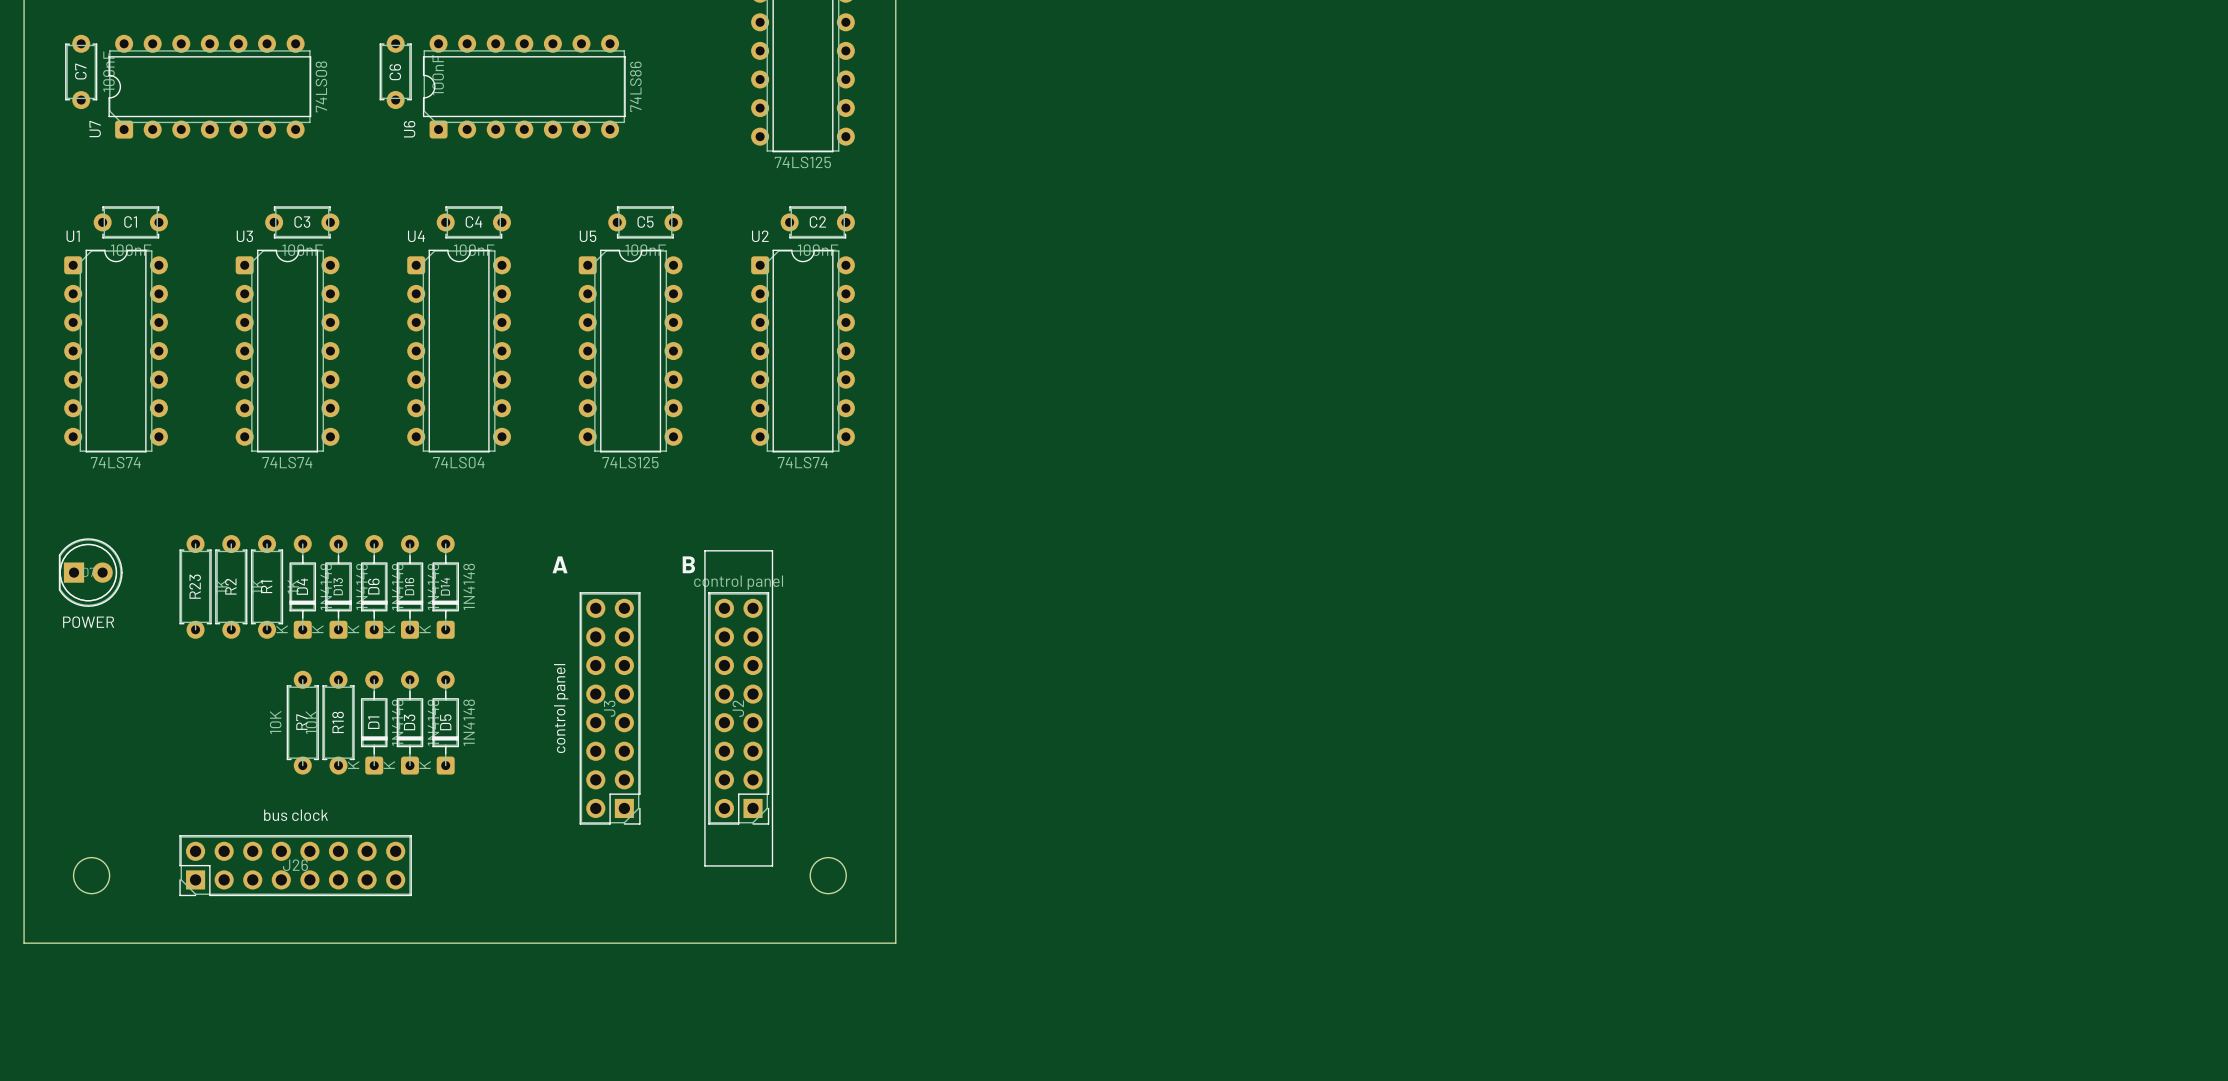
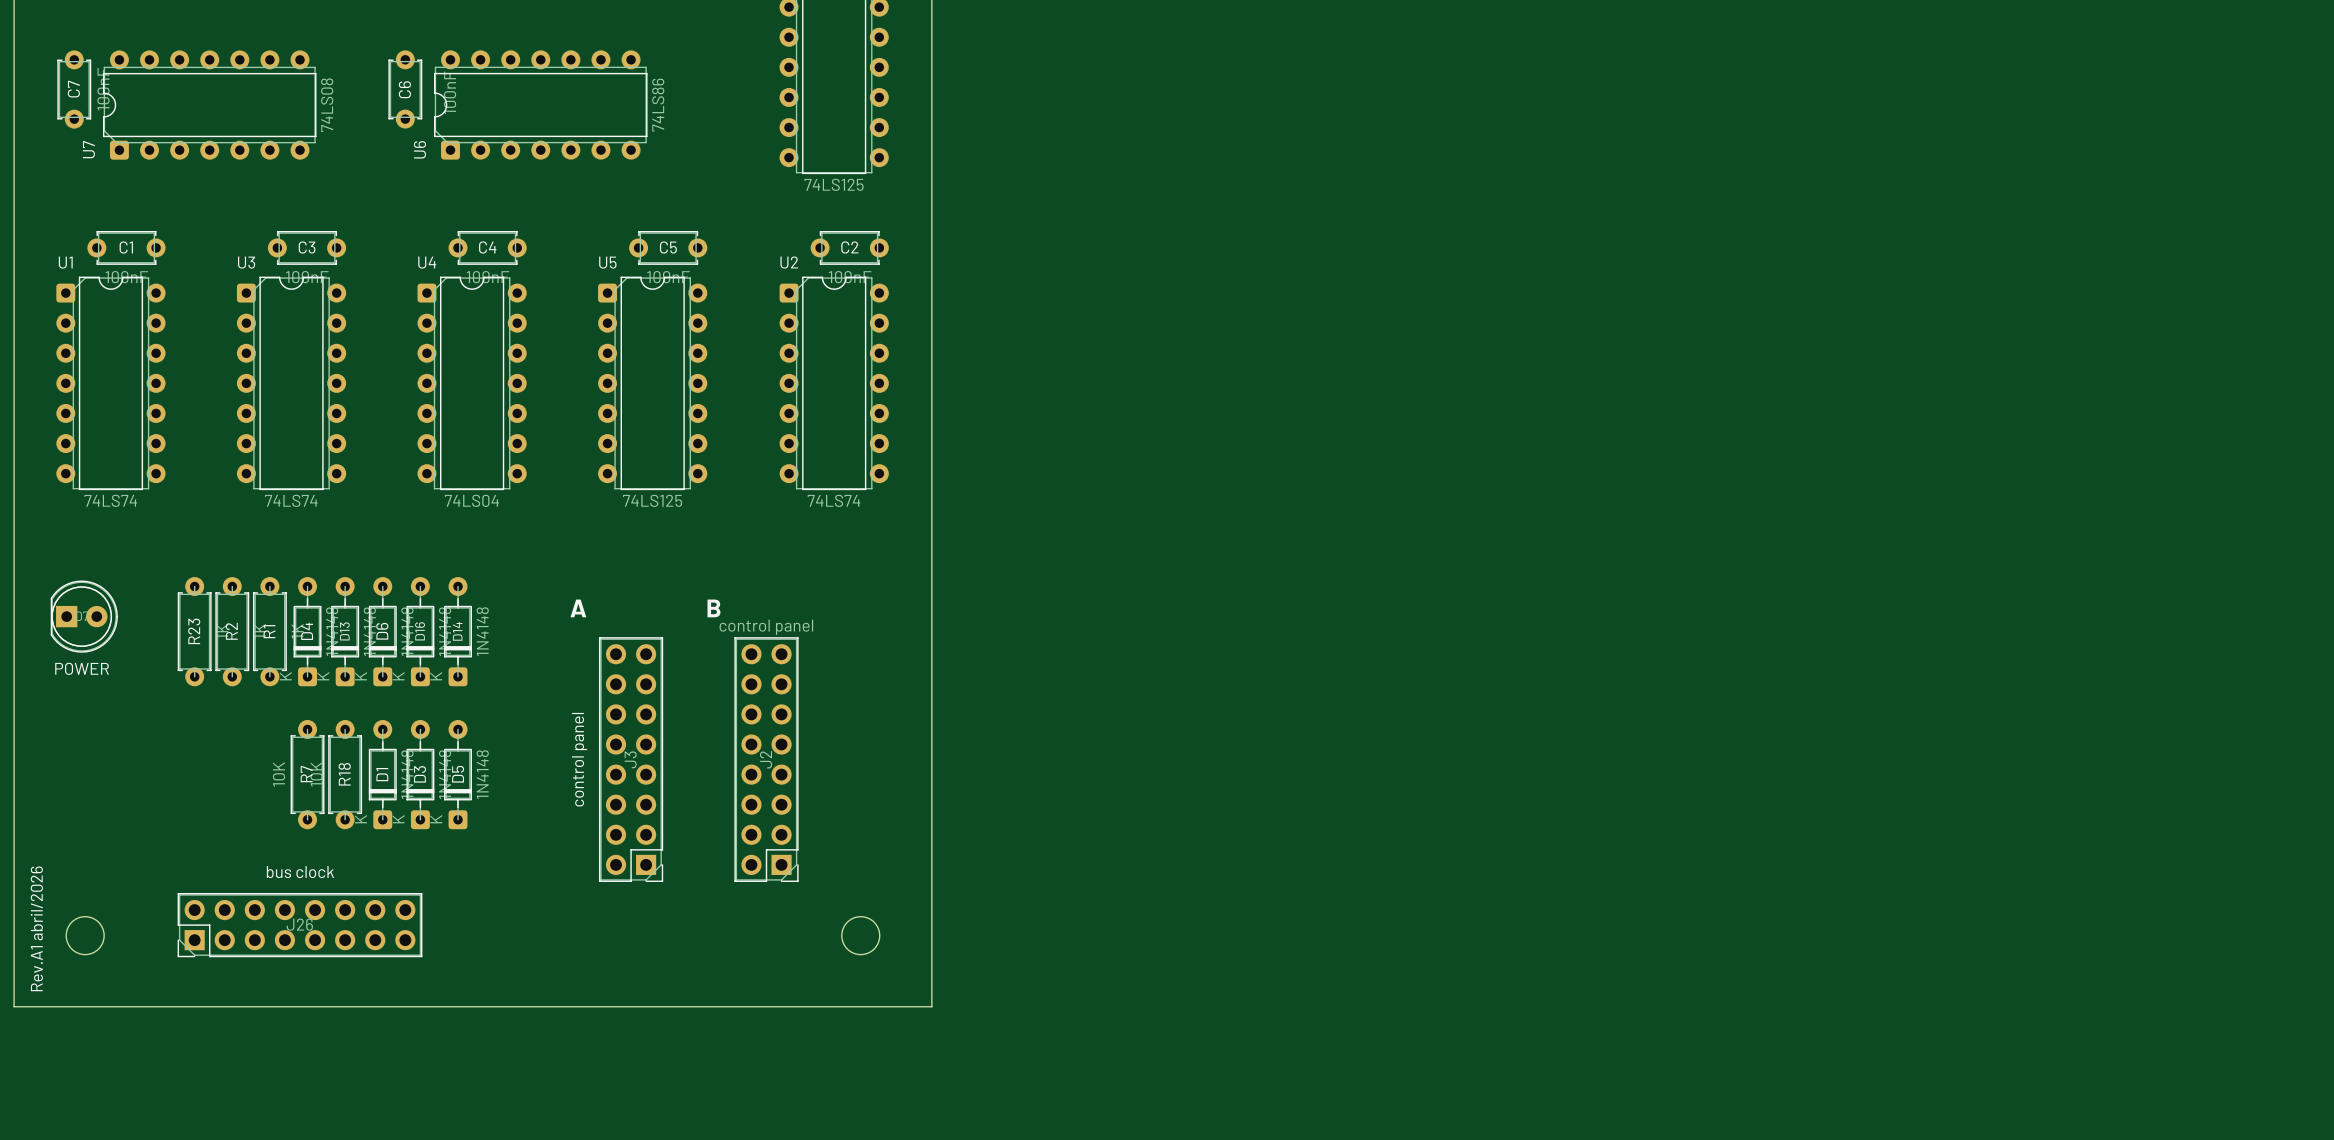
line: (704, 550) (772, 550) (772, 865) (704, 865) (704, 550) -> none
text: none -> Rev.A1 abril/2026 (36, 928)

